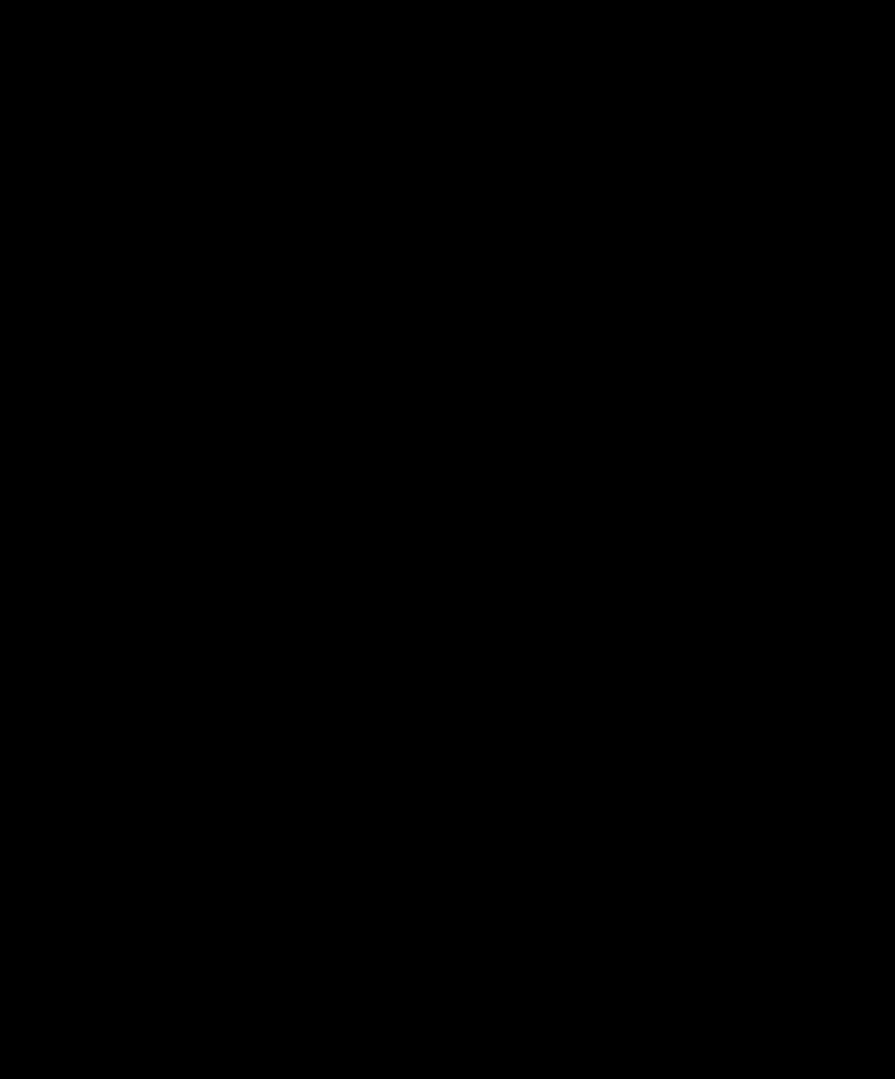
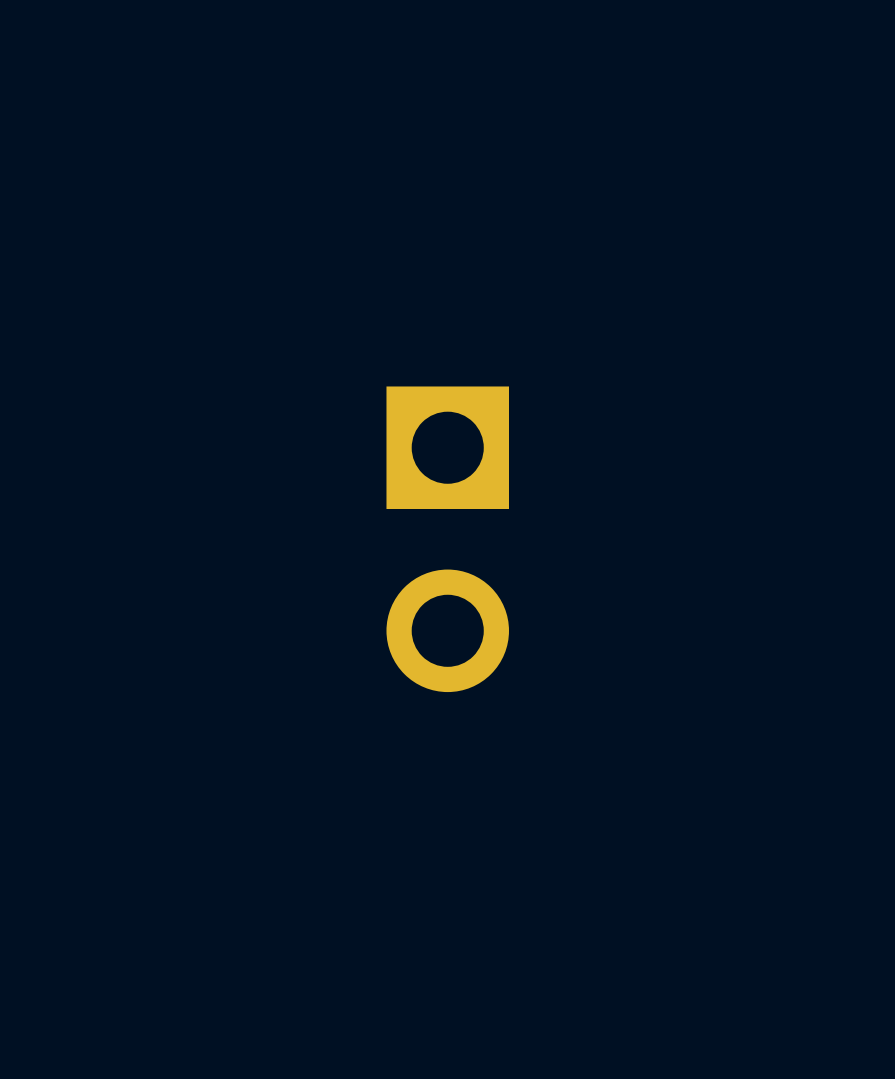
part: none -> (447, 539)

